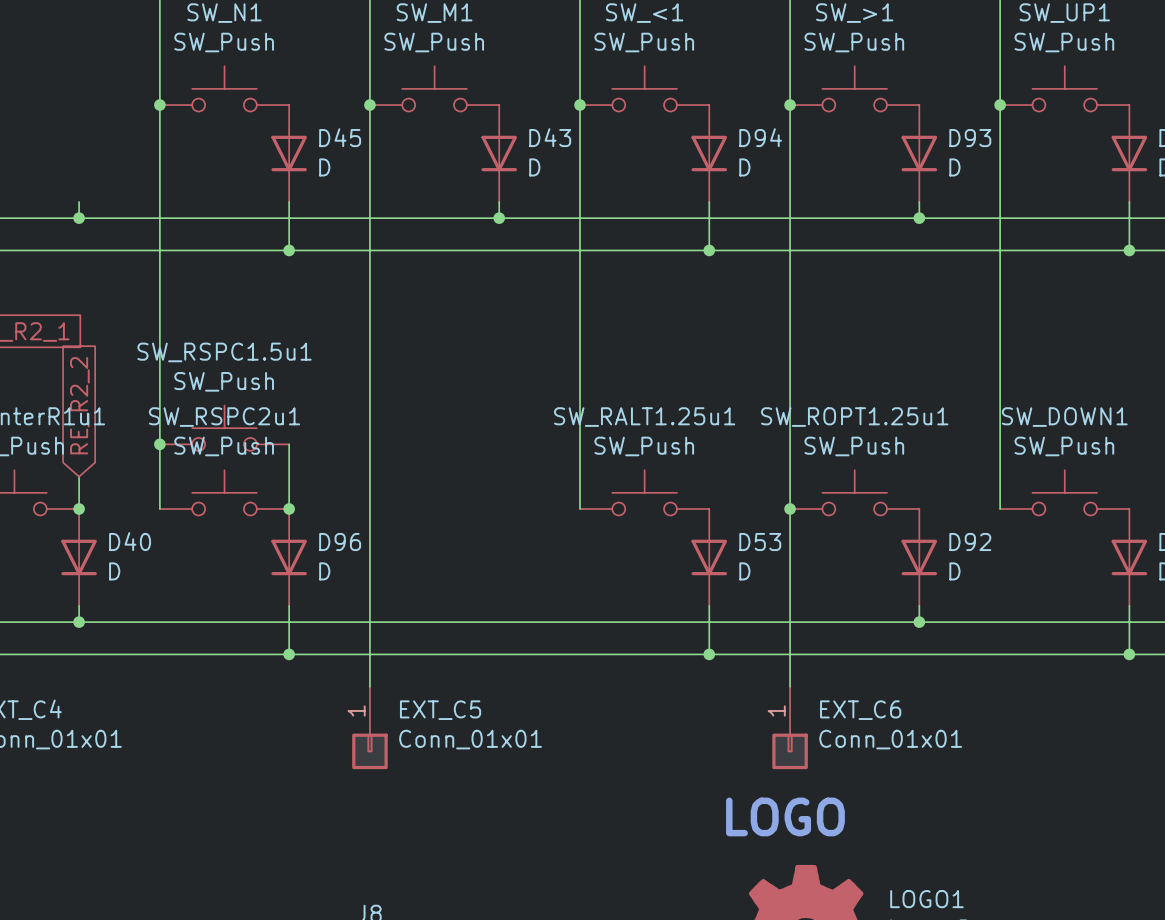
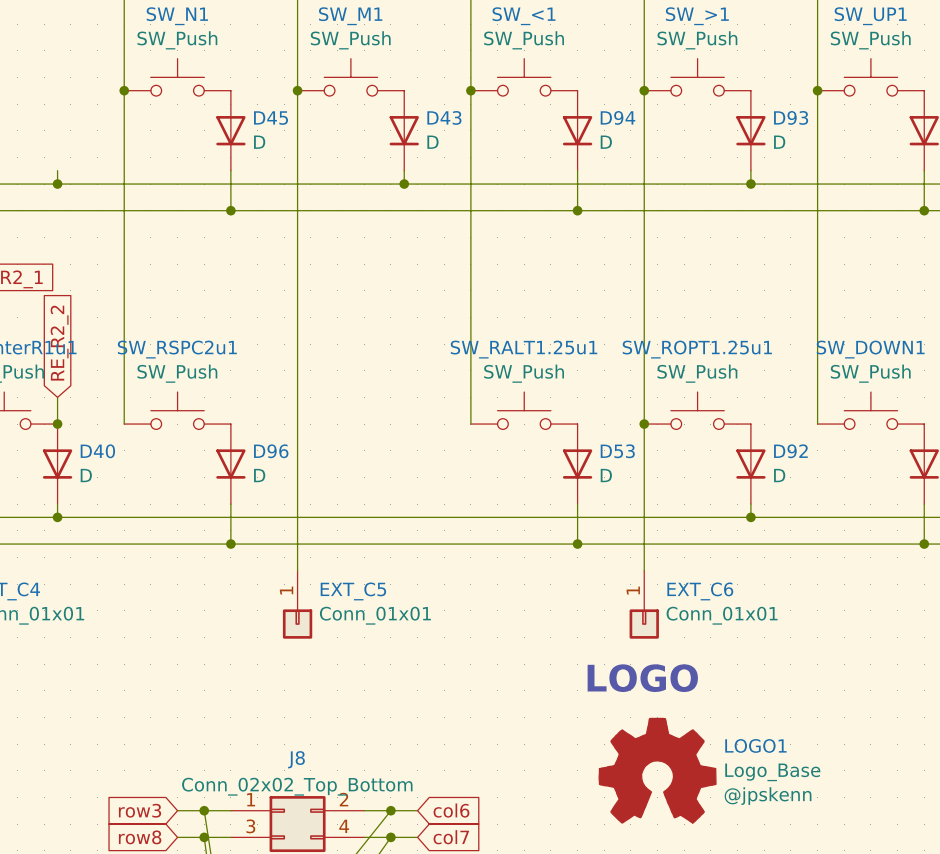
SW_RSPC1.5u1: SW_Push (224, 428) -> none
junction: (159, 444) -> none
wire: (289, 444) (289, 508) -> none
junction: (289, 508) -> none

